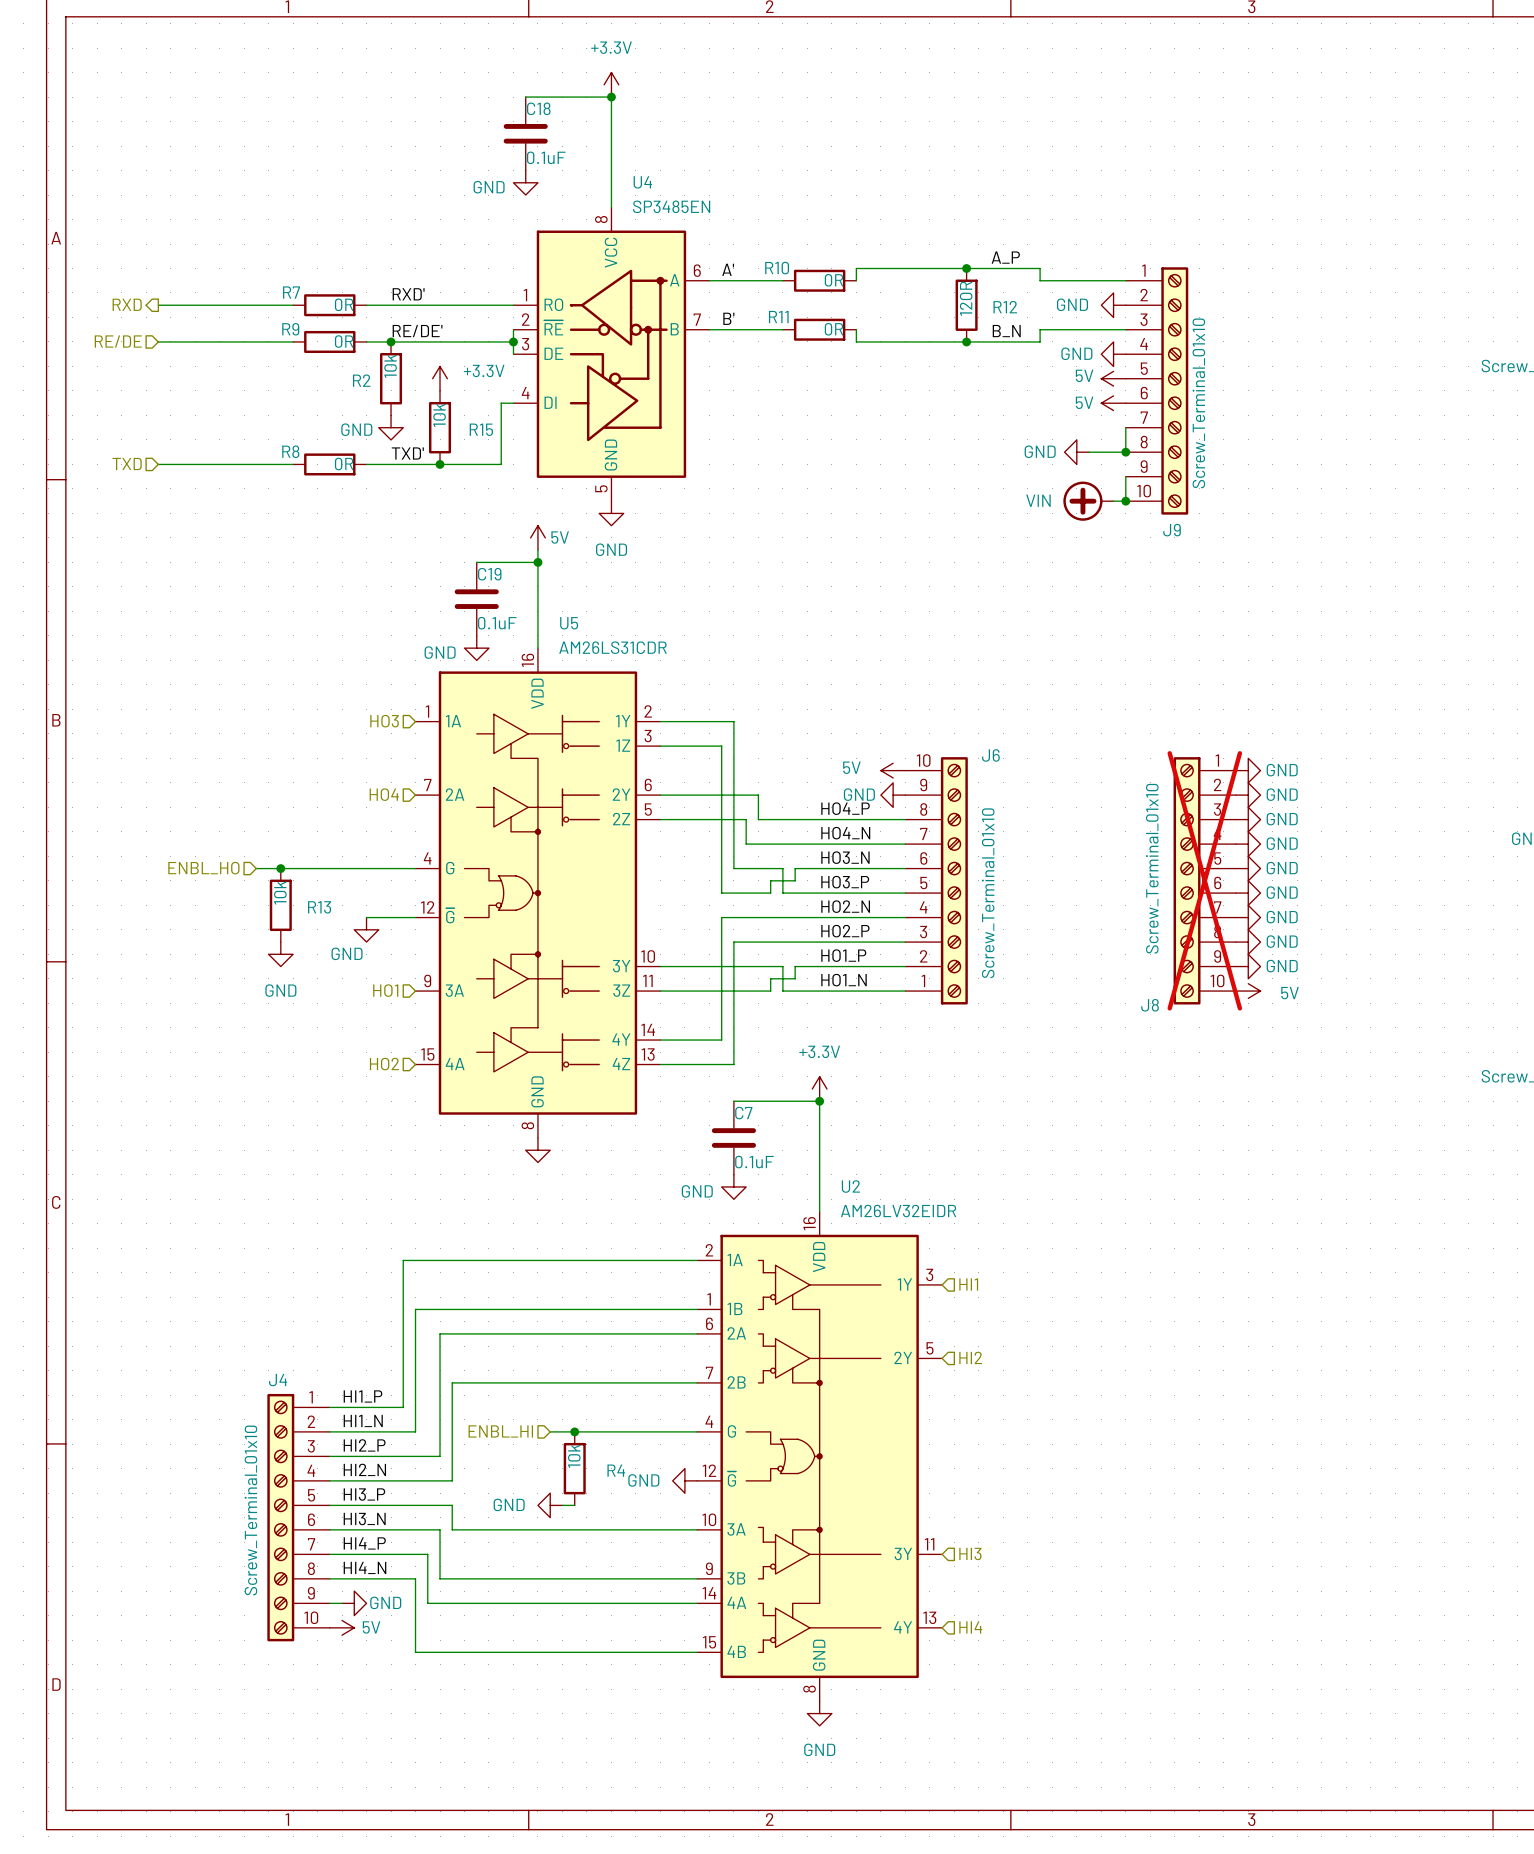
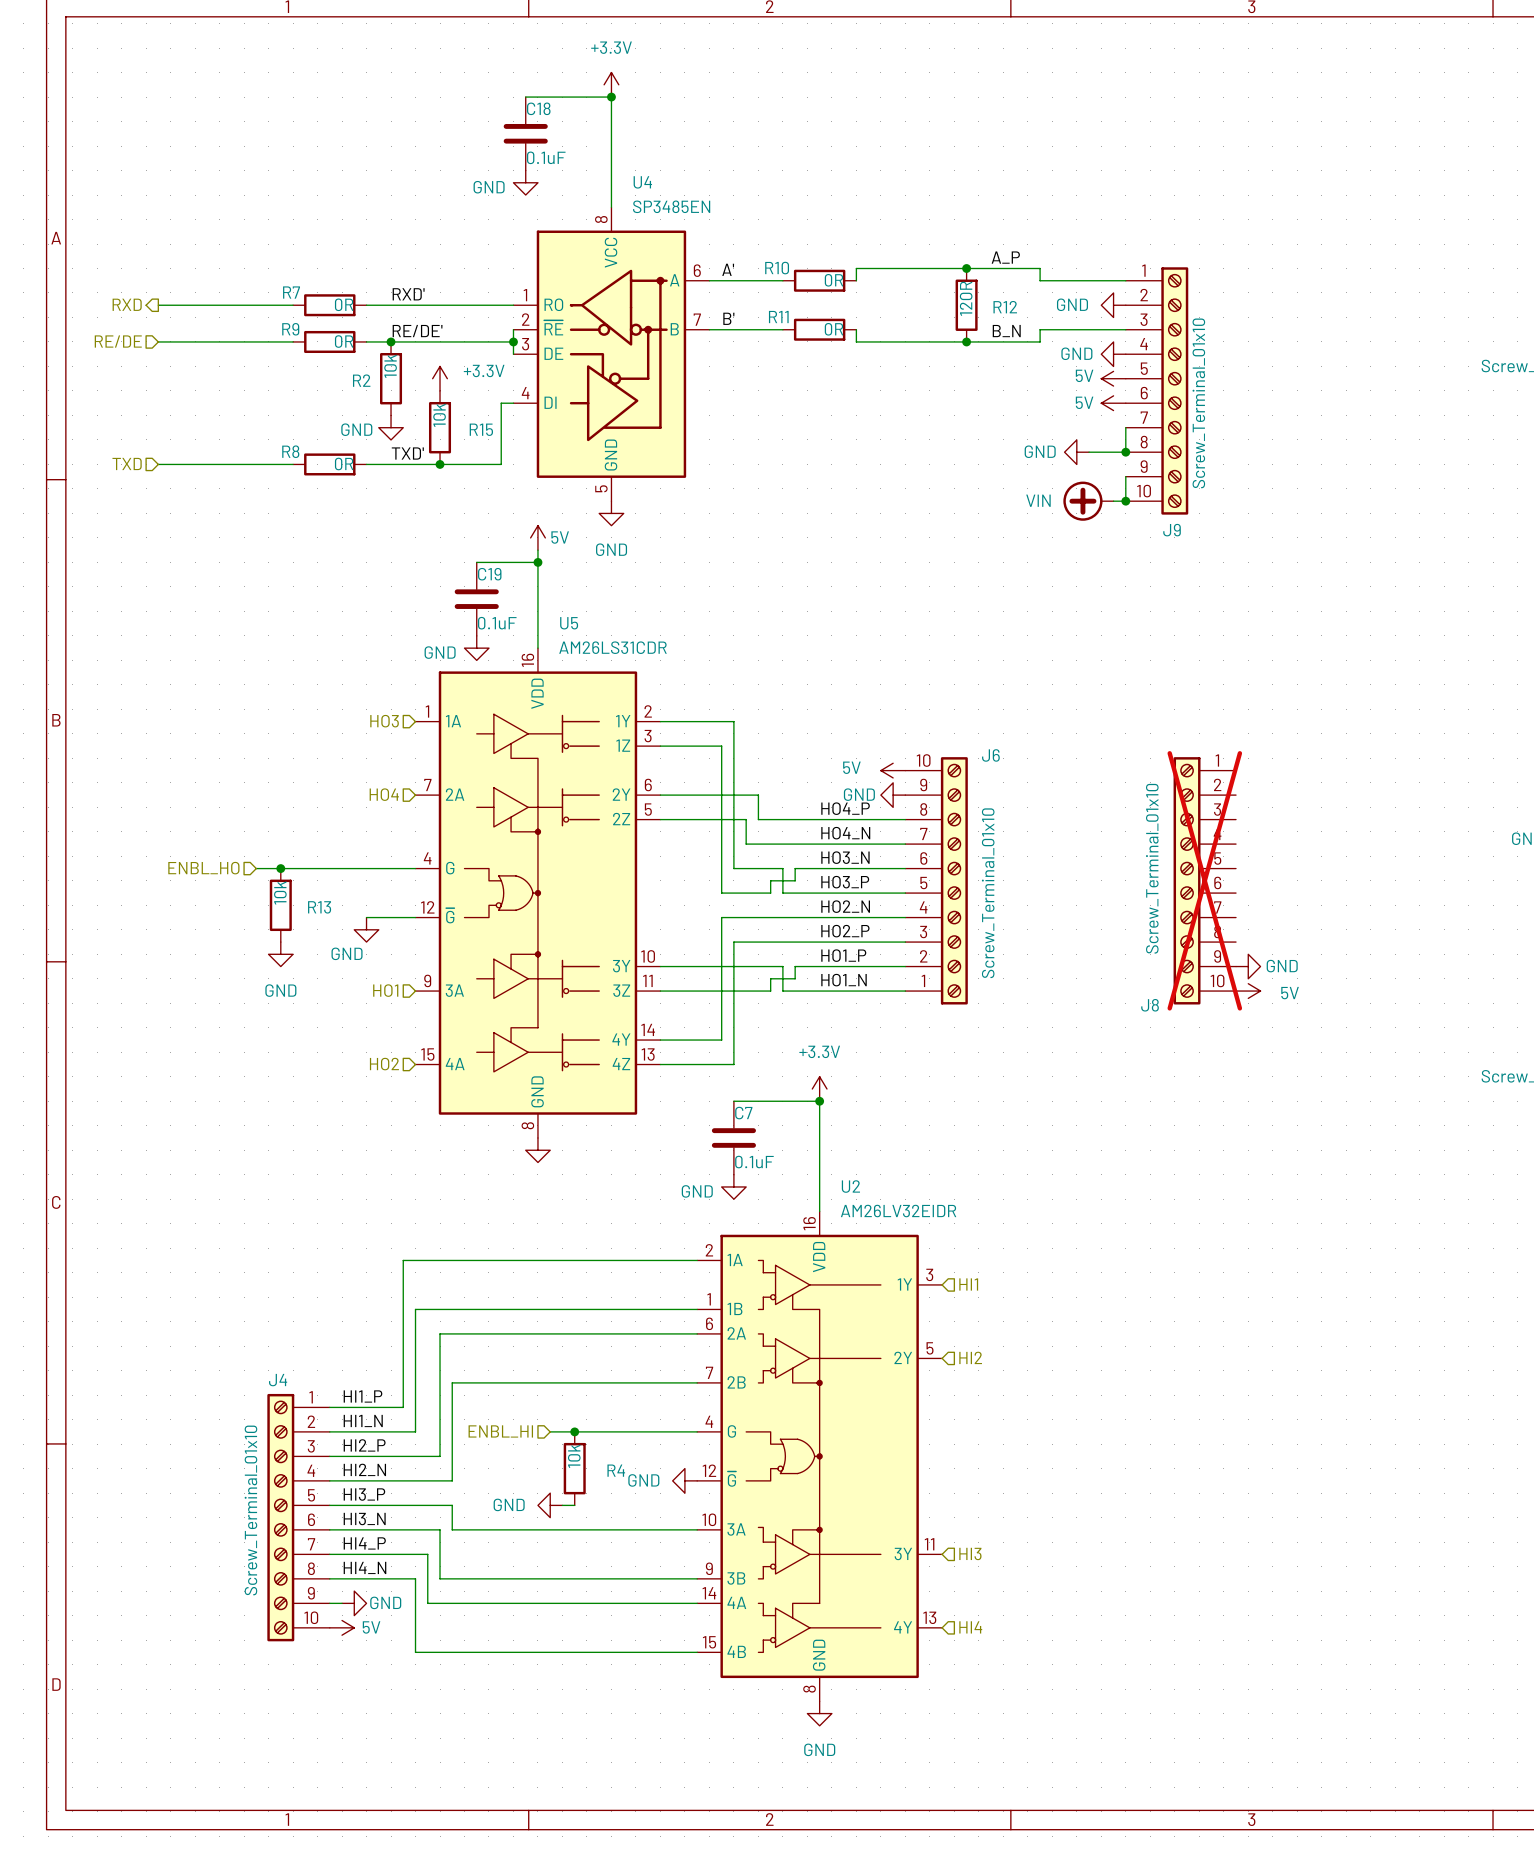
power symbol: GND (1248, 770) -> none
power symbol: GND (1248, 795) -> none
power symbol: GND (1248, 819) -> none
power symbol: GND (1248, 844) -> none
power symbol: GND (1248, 868) -> none
power symbol: GND (1248, 893) -> none
power symbol: GND (1248, 917) -> none
power symbol: GND (1248, 942) -> none

